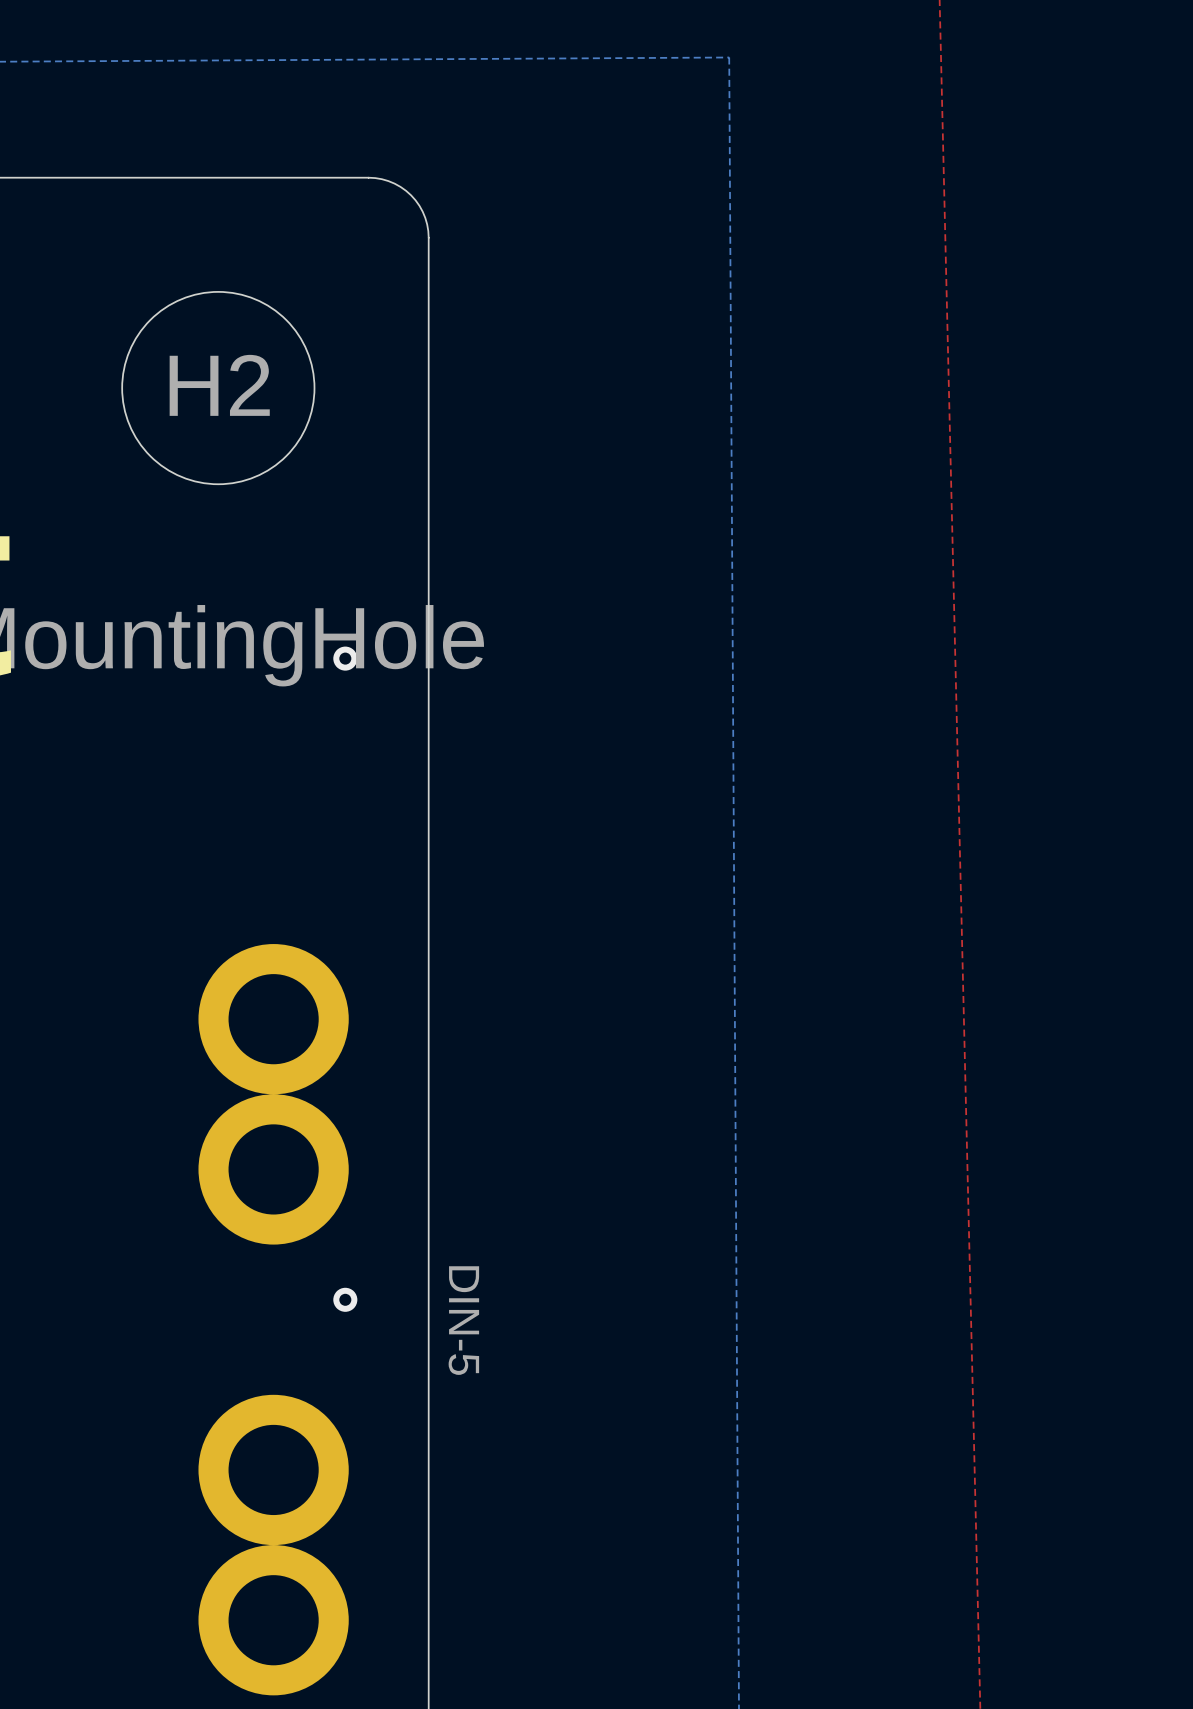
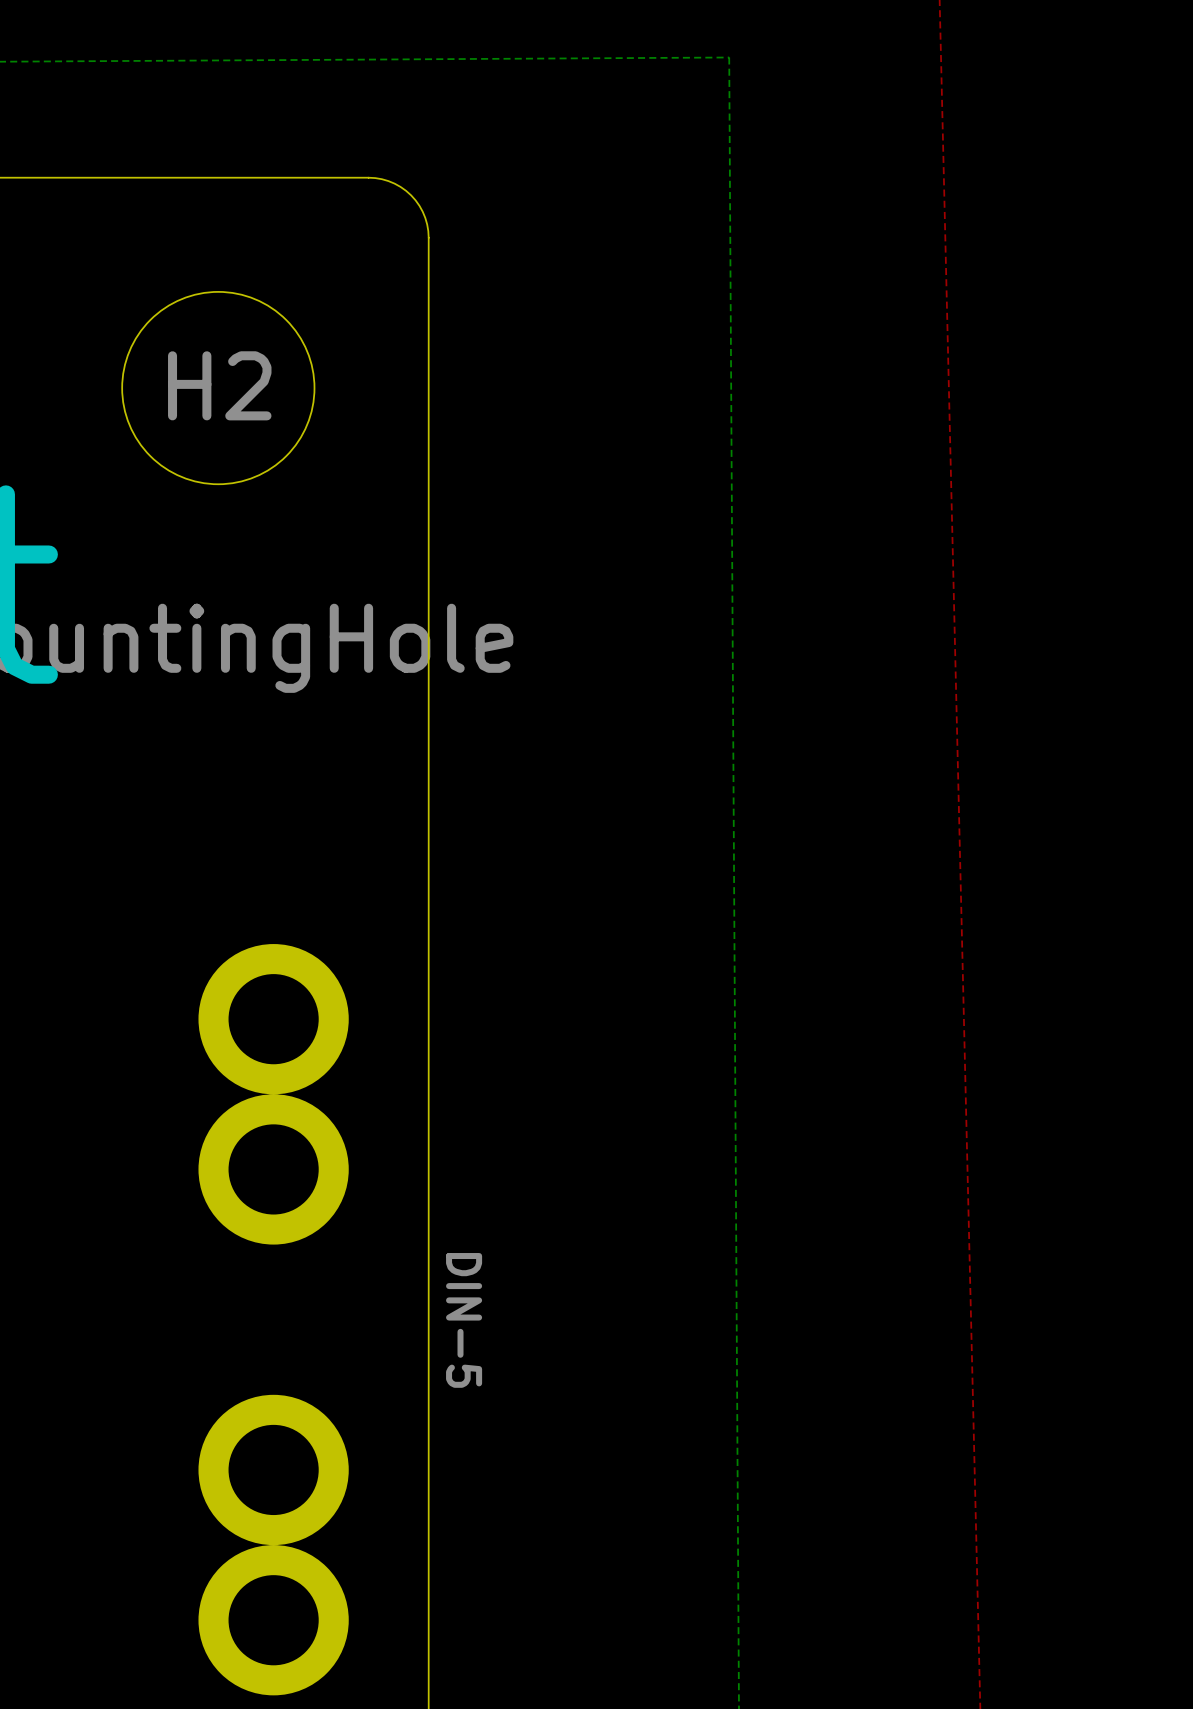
via: (345, 658) -> none
via: (345, 1299) -> none

